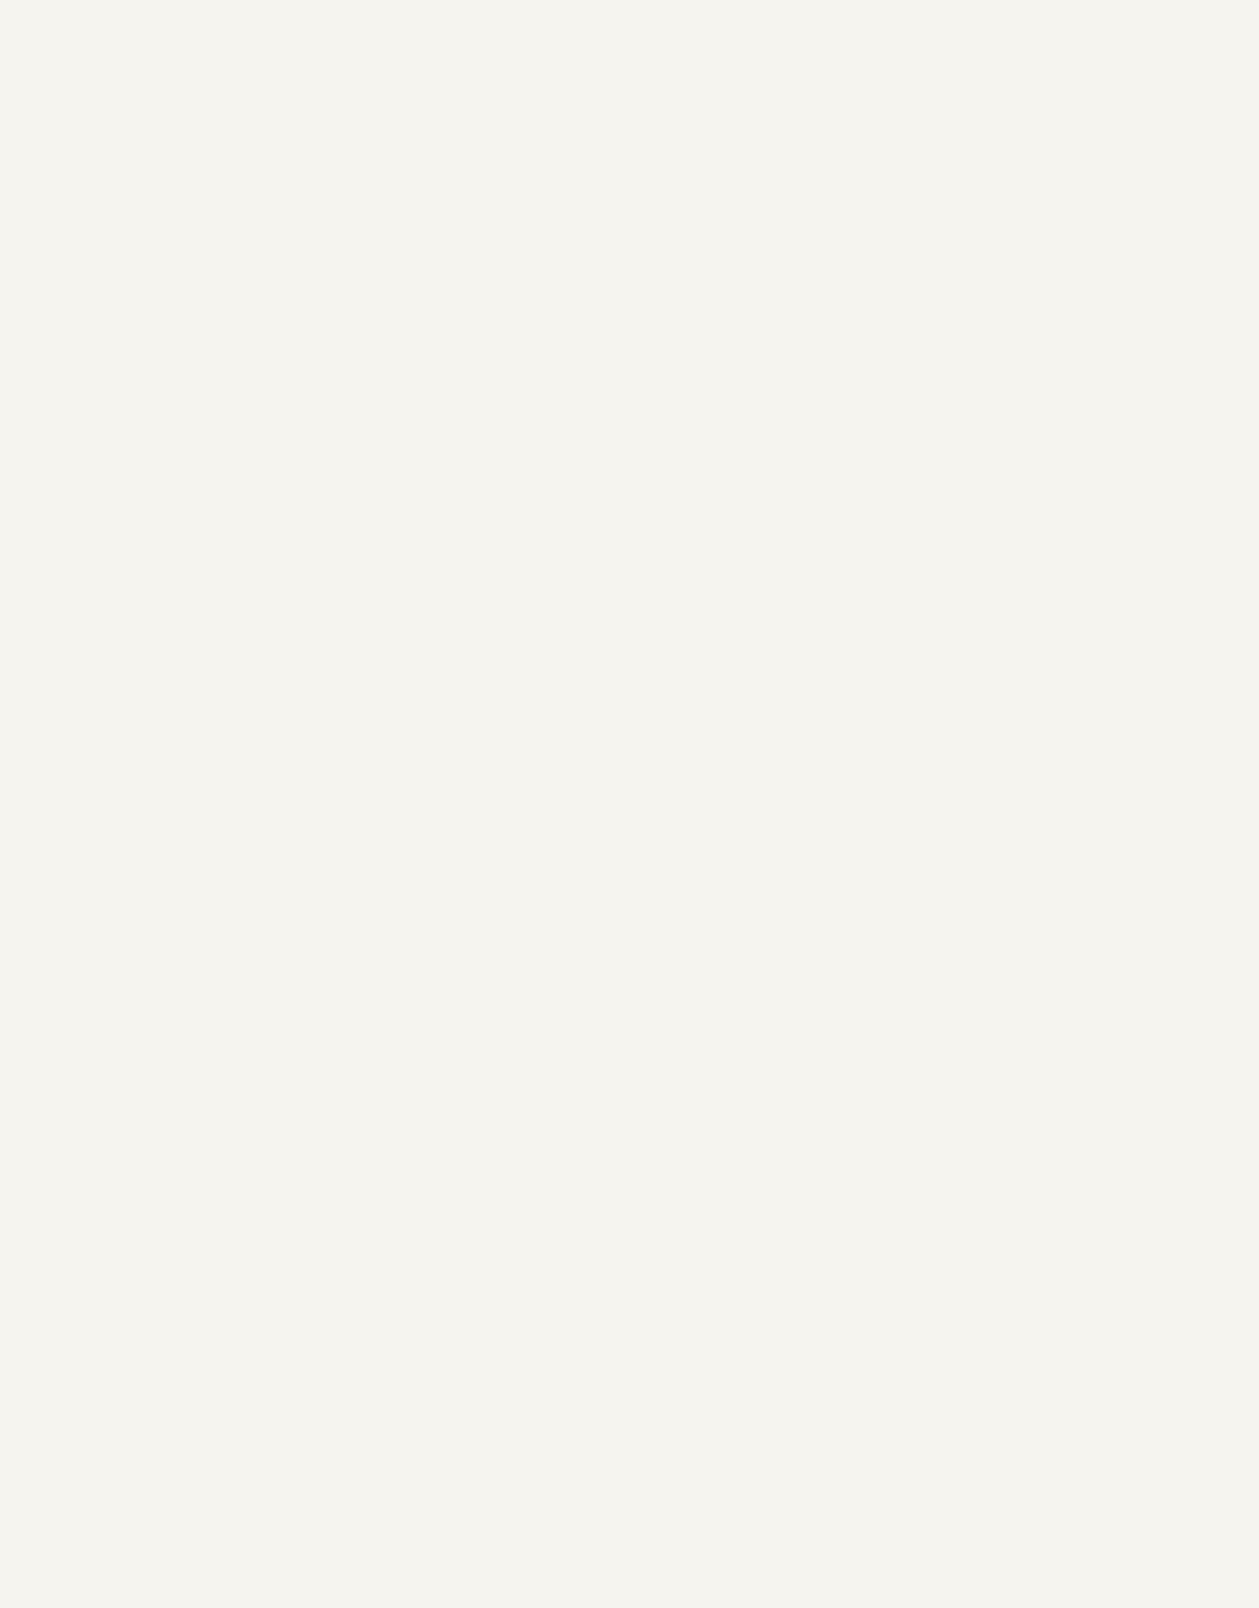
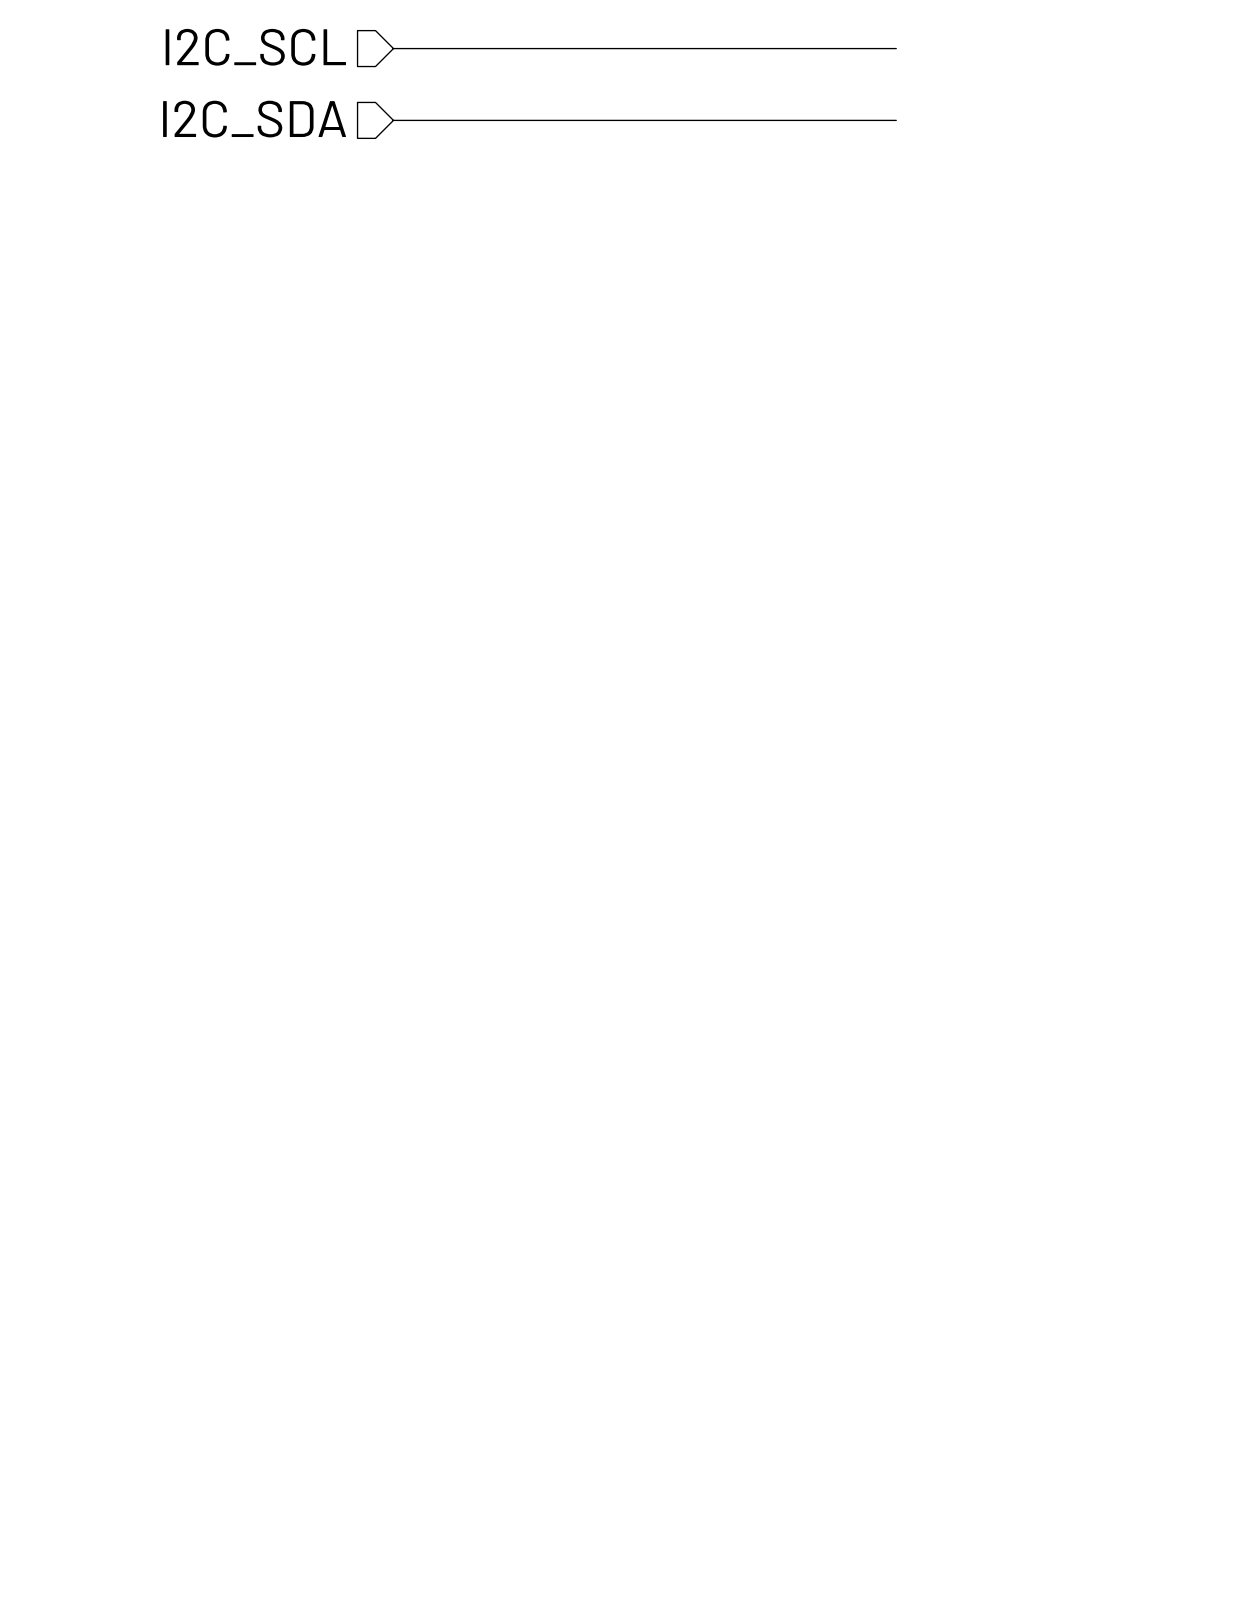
hierarchical label: none -> I2C_SCL (255, 47)
wire: none -> (393, 48) (896, 48)
hierarchical label: none -> I2C_SDA (254, 119)
wire: none -> (393, 120) (896, 120)

